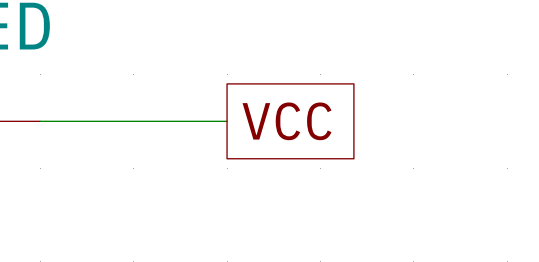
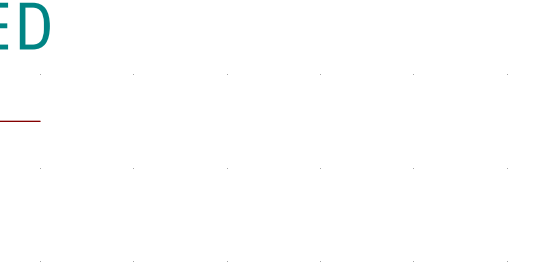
wire: (40, 121) (227, 121) -> none
global label: VCC (287, 121) -> none

